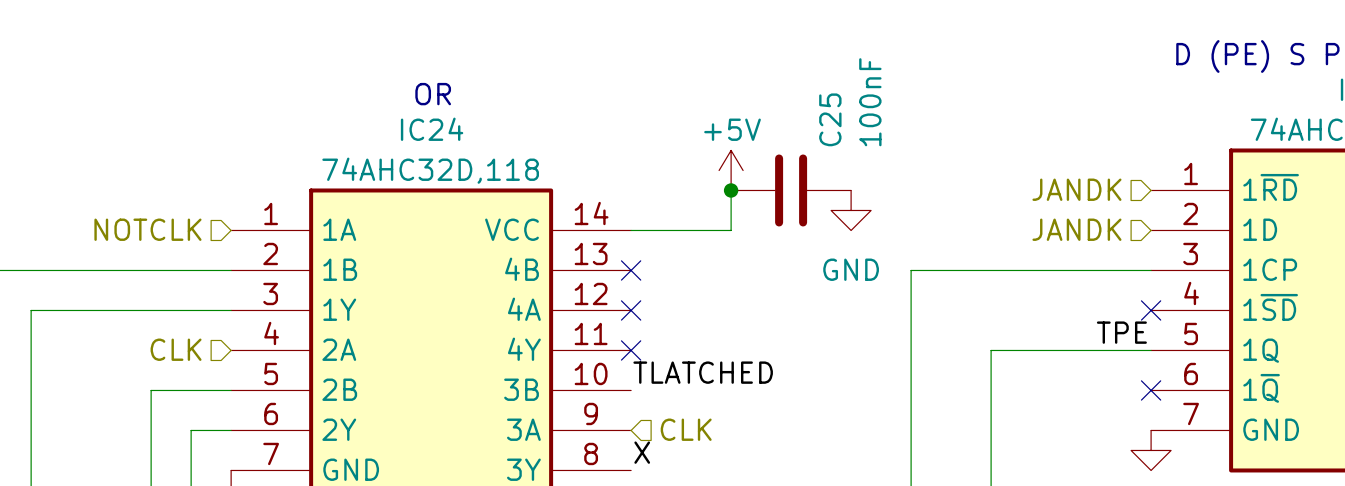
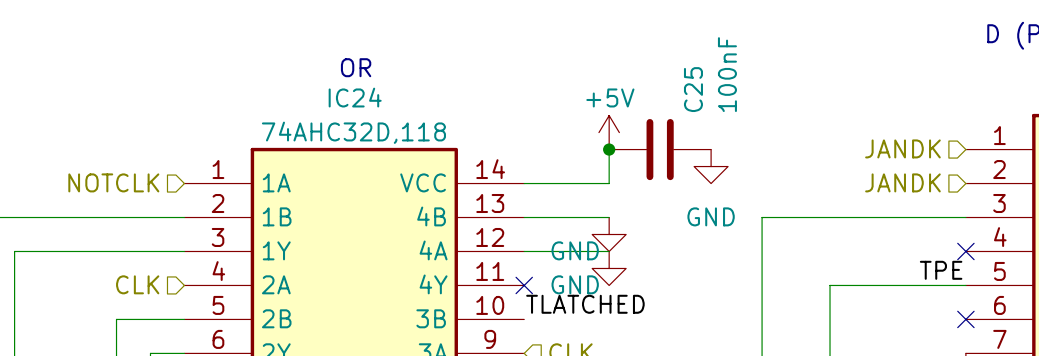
wire: none -> (524, 217) (609, 217)
no-connect mark: (631, 270) -> none
power symbol: none -> GND (609, 234)
wire: none -> (524, 251) (609, 251)
no-connect mark: (631, 310) -> none
power symbol: none -> GND (609, 268)

